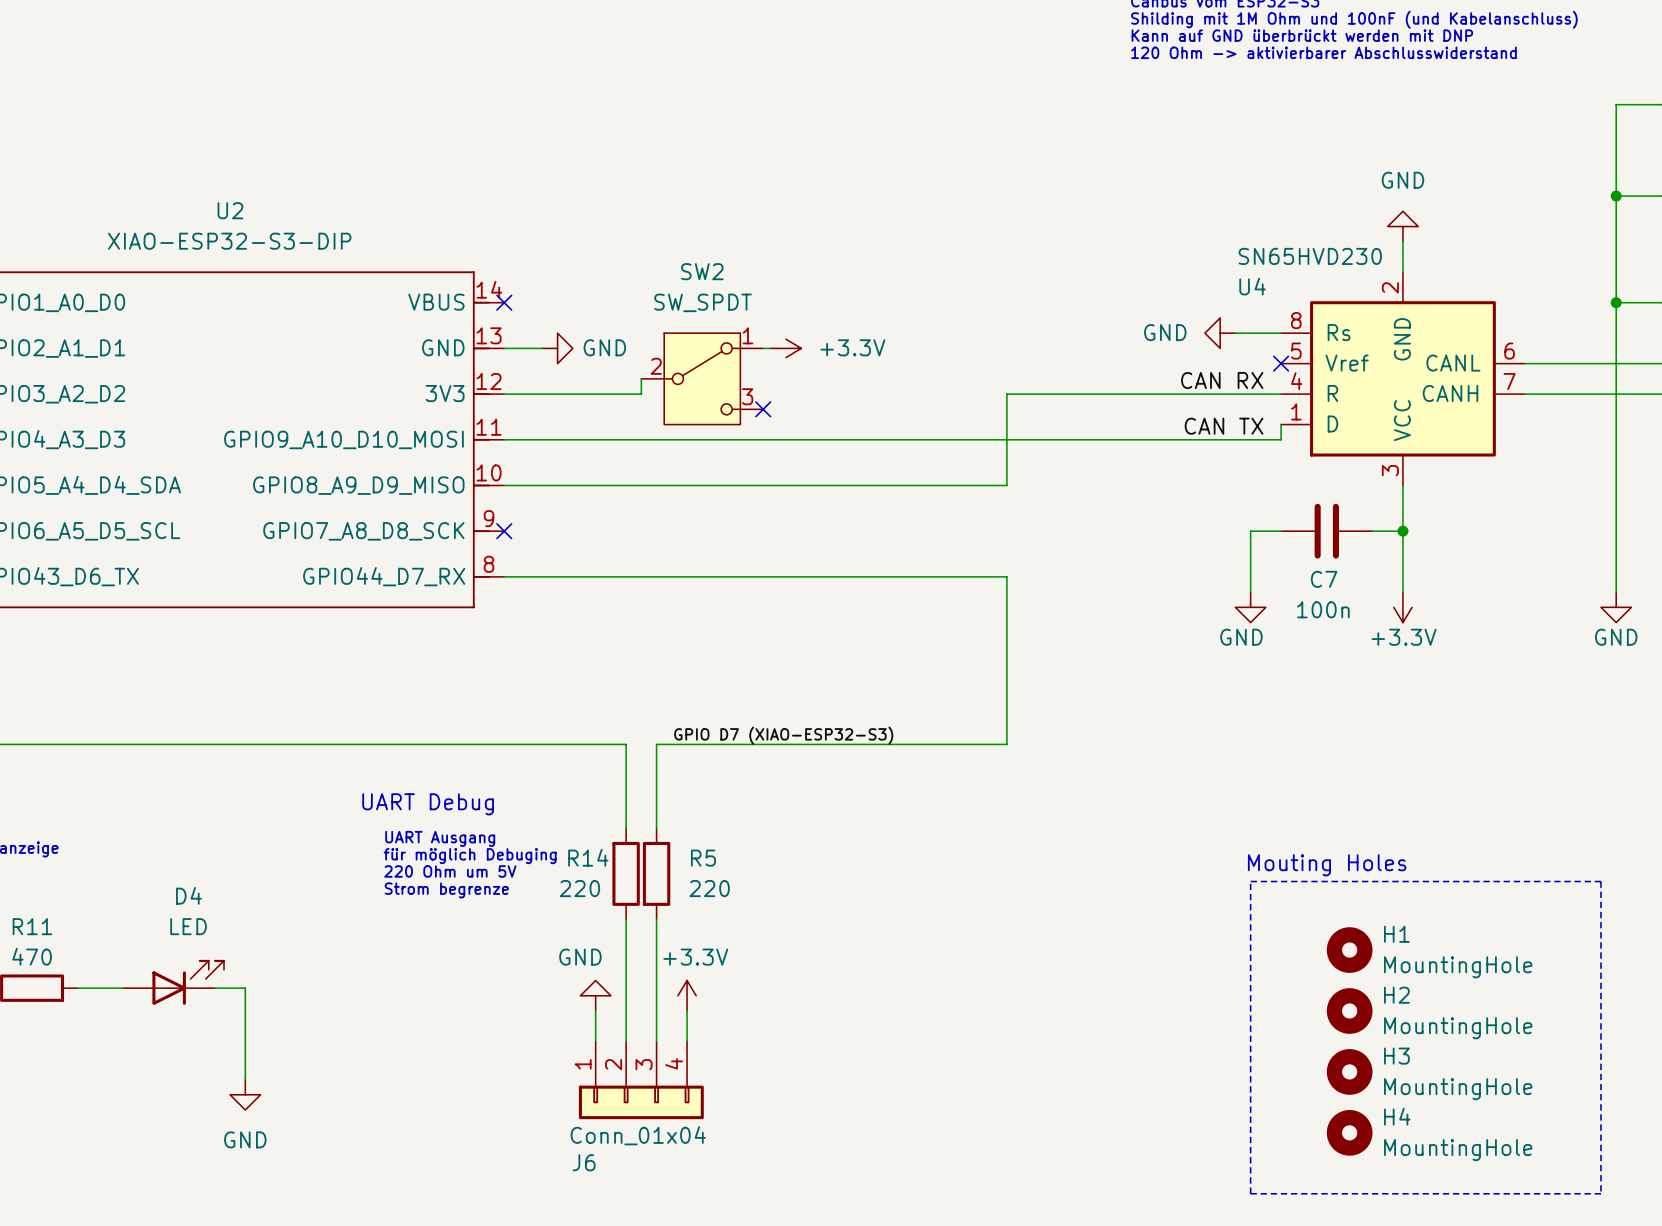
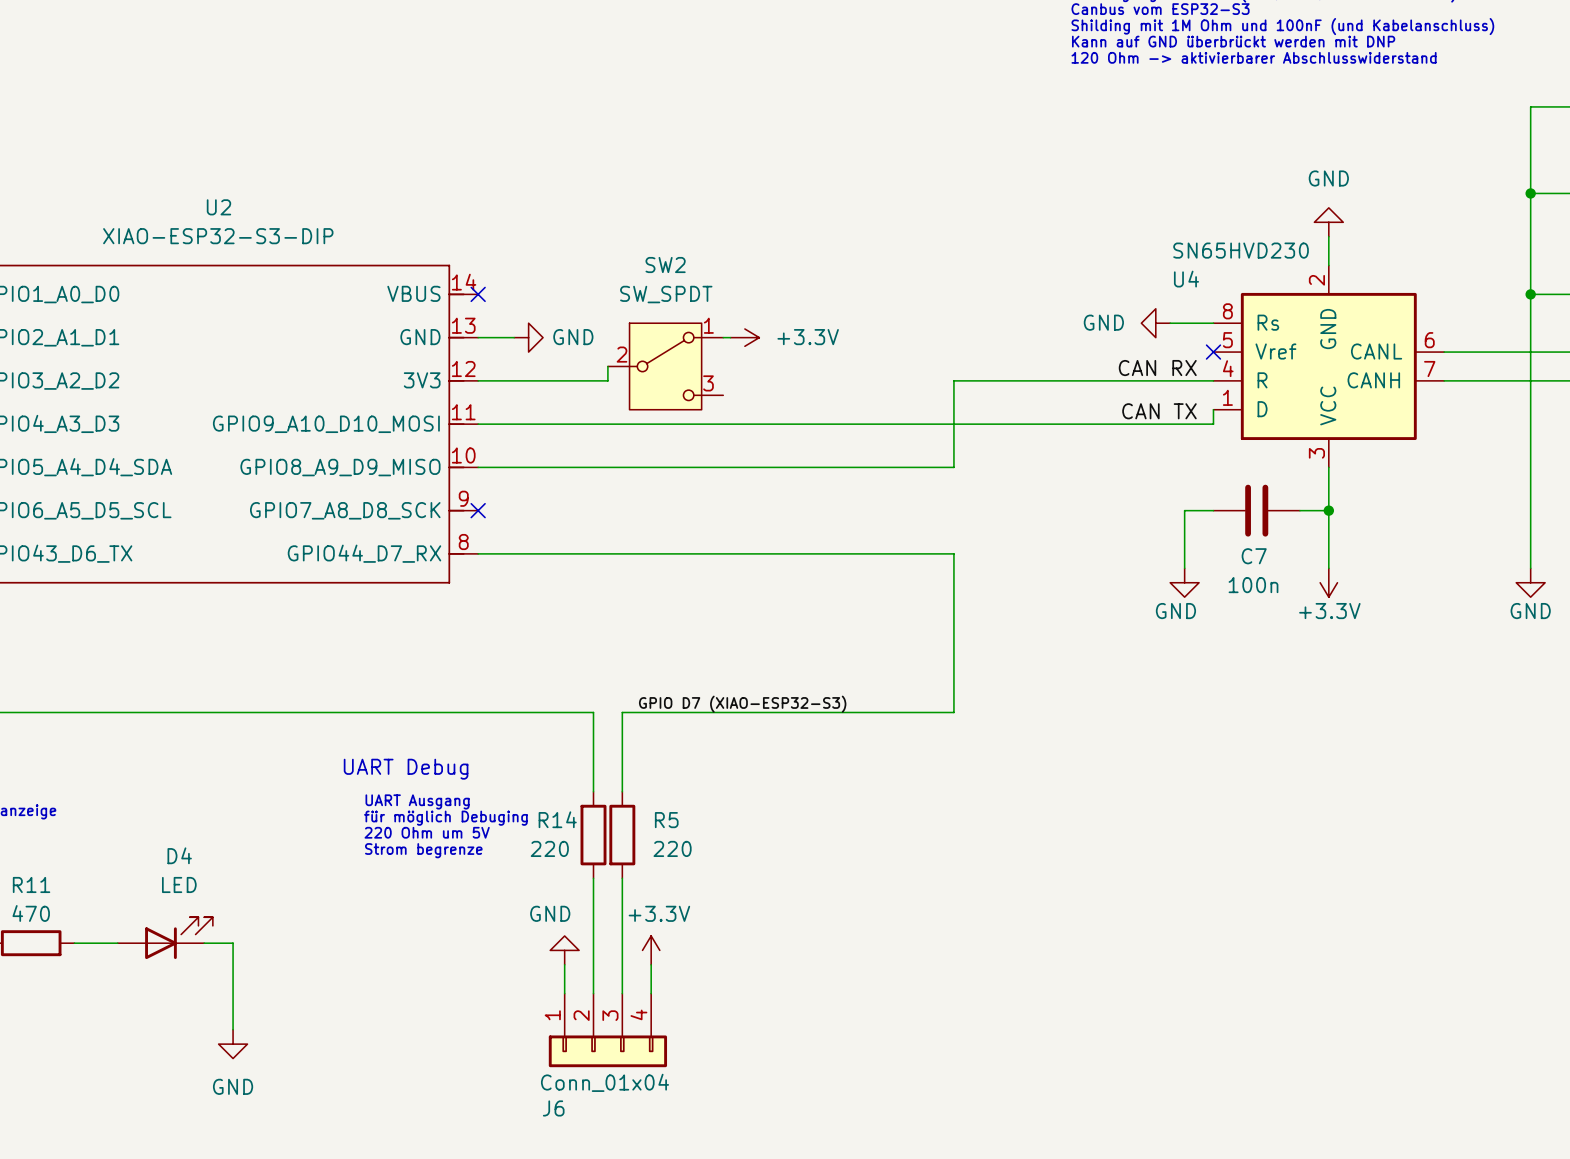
no-connect mark: (763, 409) -> none
text: Mouting Holes (1327, 865) -> none
line: (1250, 881) (1600, 881) (1600, 1193) (1250, 1193) (1250, 881) -> none
H1: MountingHole (1349, 950) -> none
H2: MountingHole (1349, 1010) -> none
H3: MountingHole (1349, 1071) -> none
H4: MountingHole (1349, 1132) -> none

